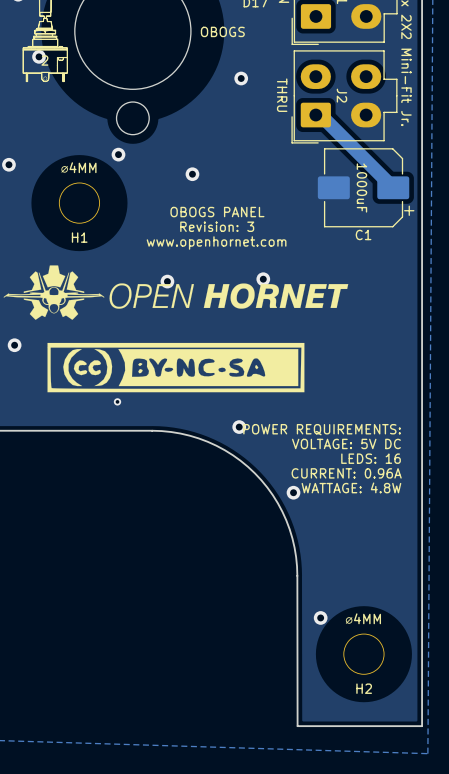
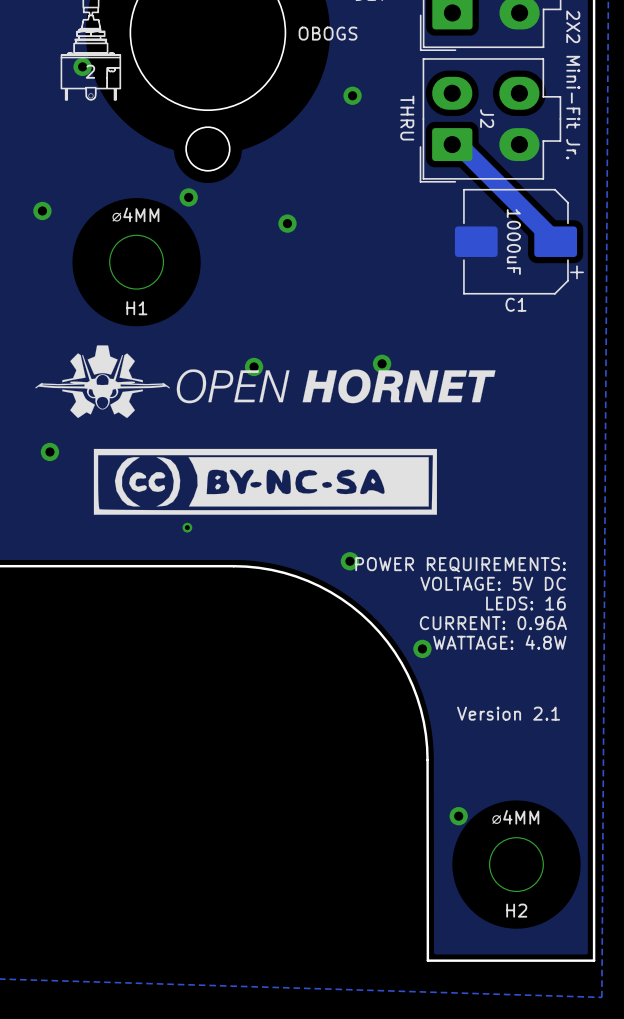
text: OBOGS PANEL (217, 212) -> none
text: Revision: 3 (217, 226) -> none
text: www.openhornet.com (216, 243) -> none
text: none -> Version 2.1 (508, 713)

